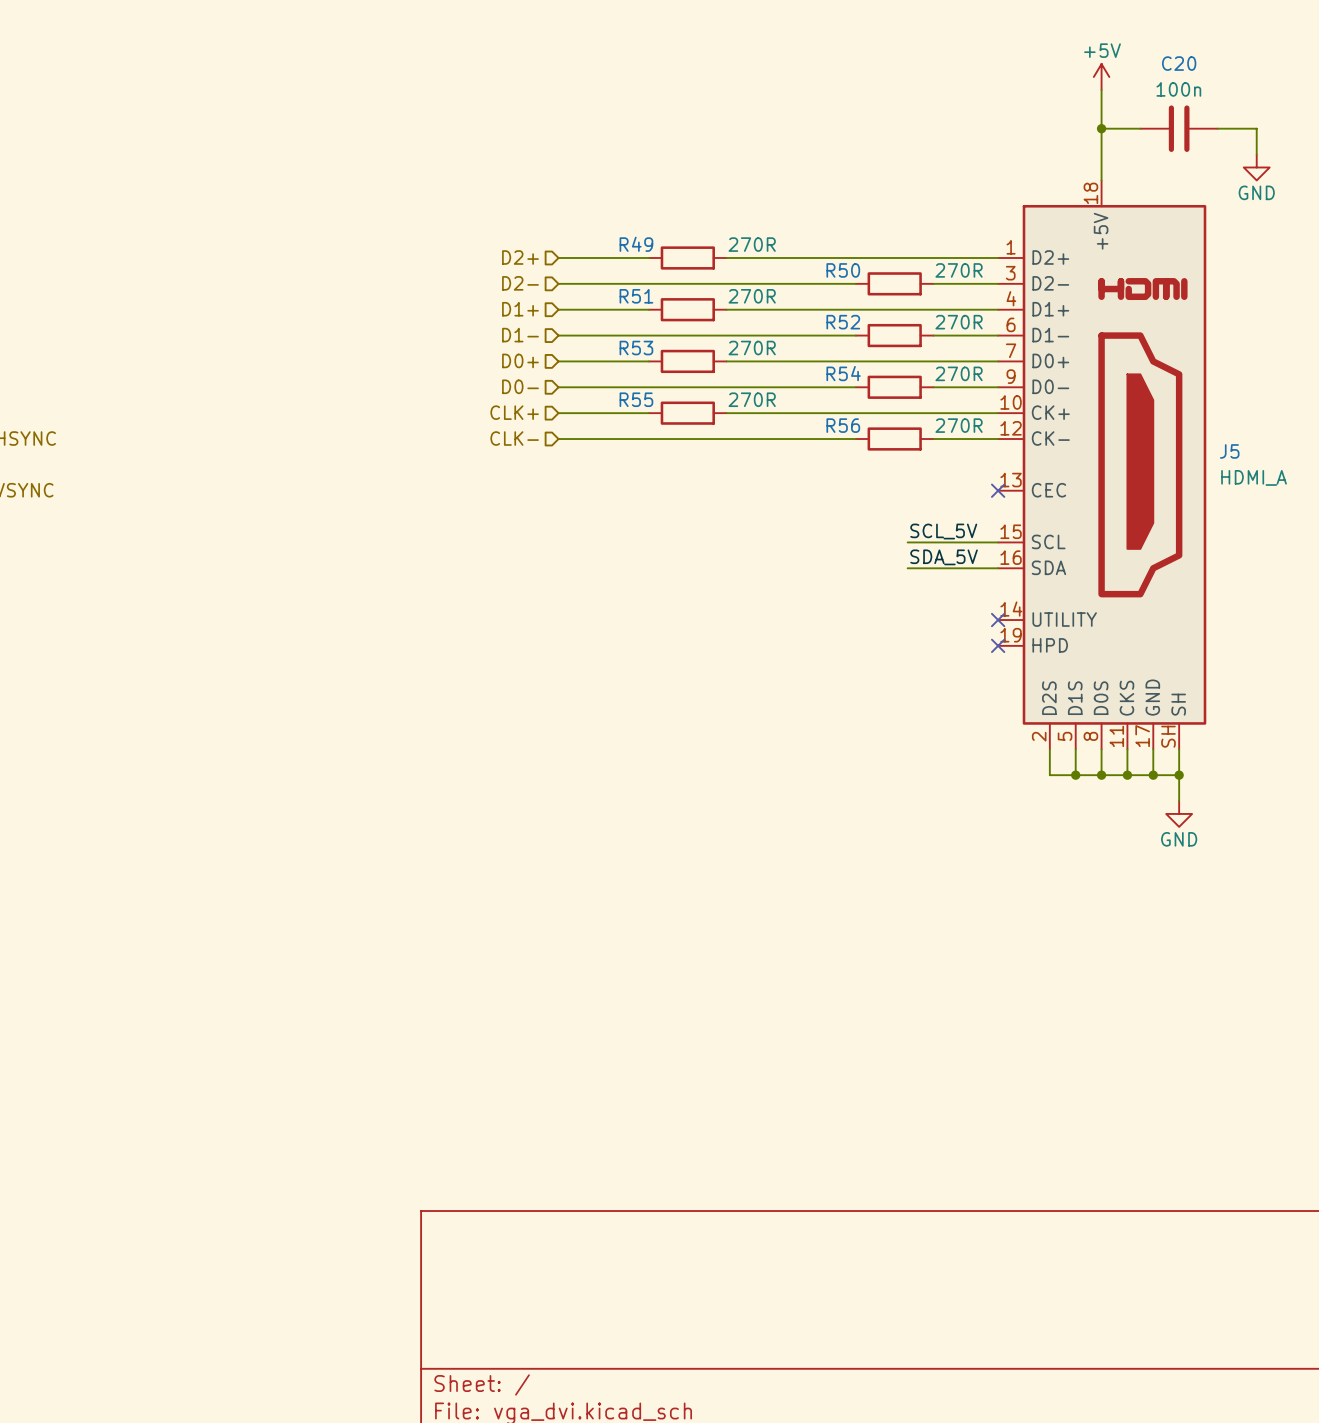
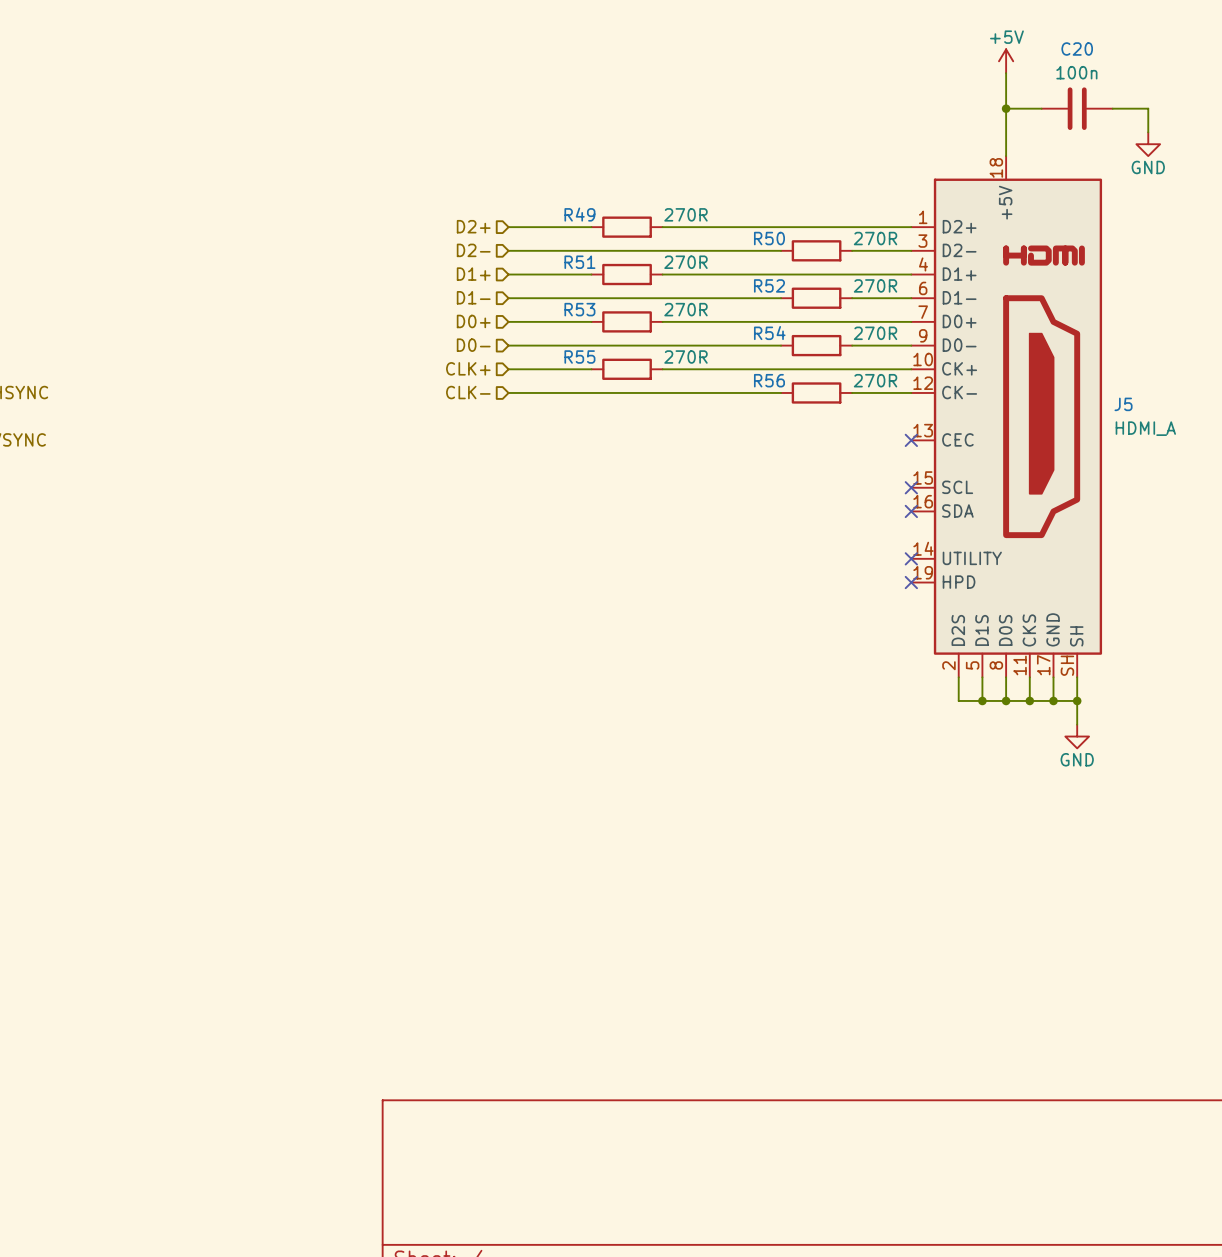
label: SCL_5V (943, 531) -> none
wire: (907, 542) (998, 542) -> none
no-connect mark: none -> (911, 487)
label: SDA_5V (944, 557) -> none
wire: (907, 568) (998, 568) -> none
no-connect mark: none -> (911, 511)

